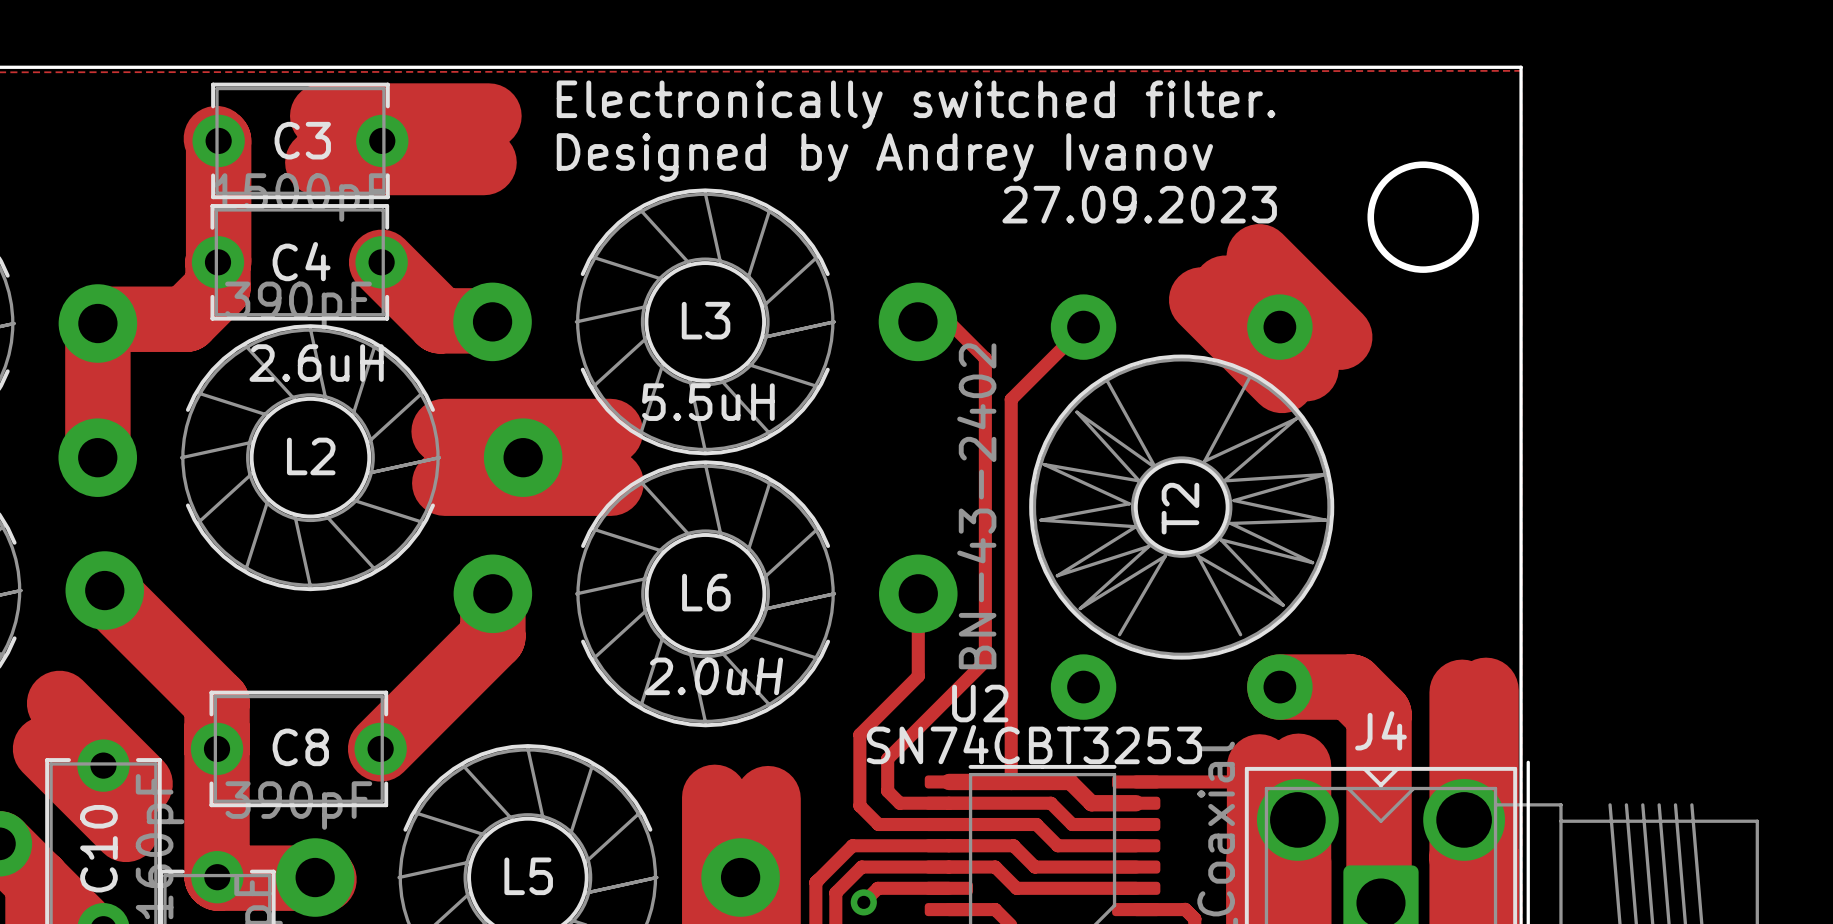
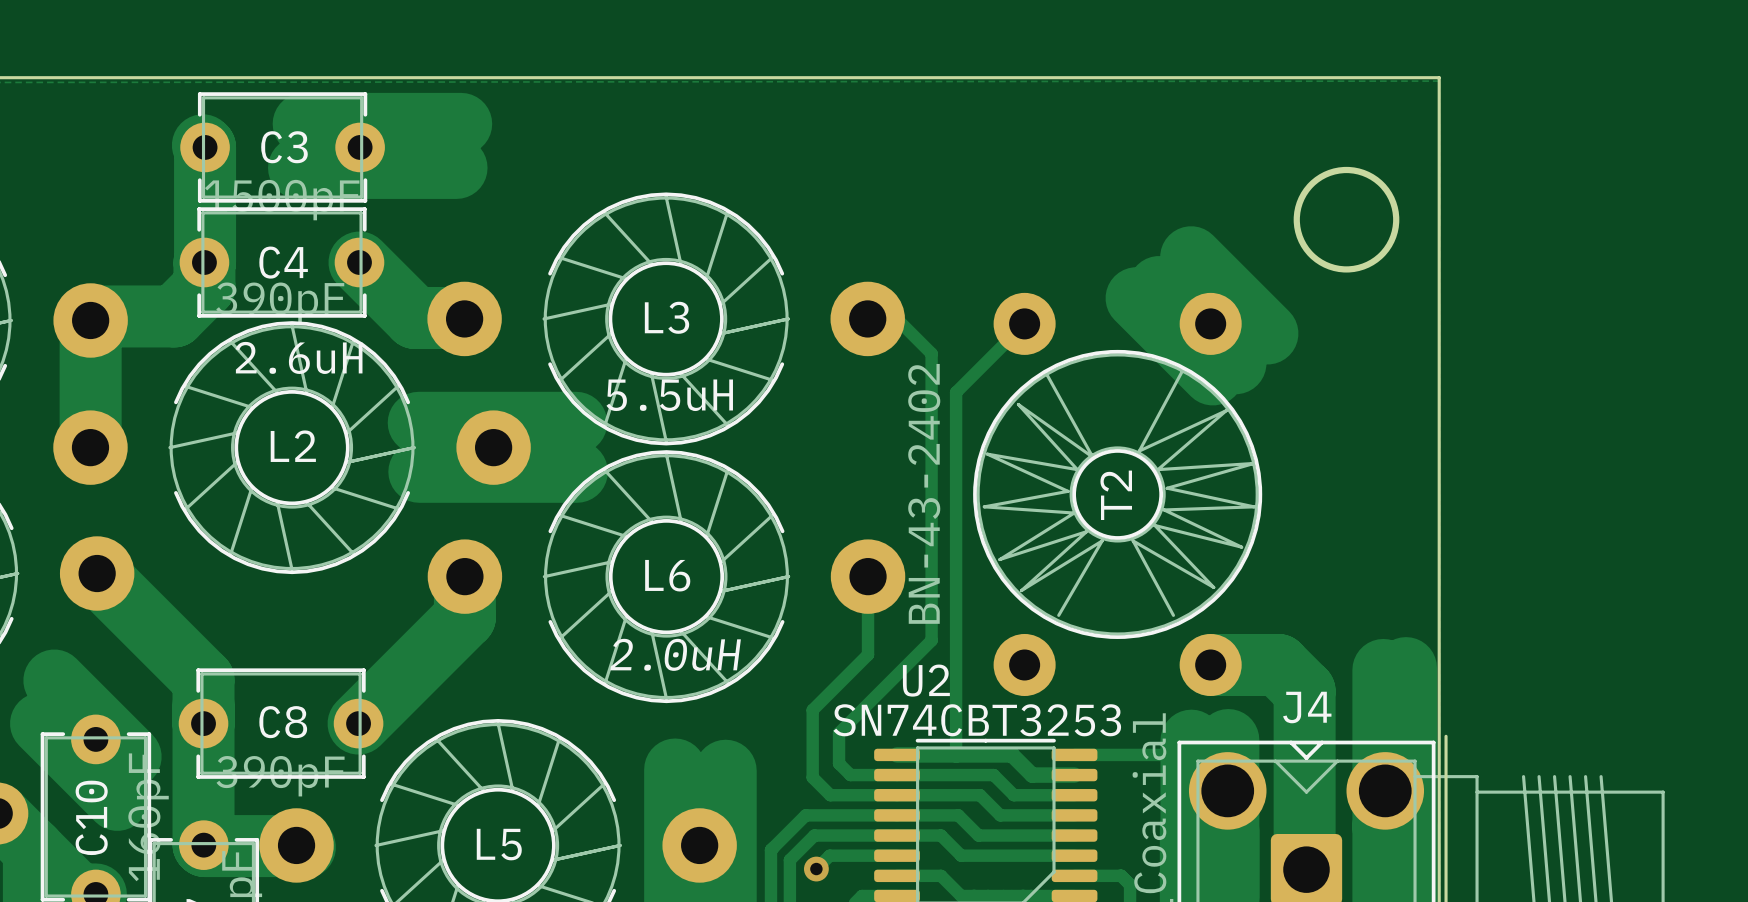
text: Electronically switched filter. (916, 104) -> none
text: Designed by Andrey Ivanov (884, 157) -> none
text: 27.09.2023 (1139, 204) -> none

